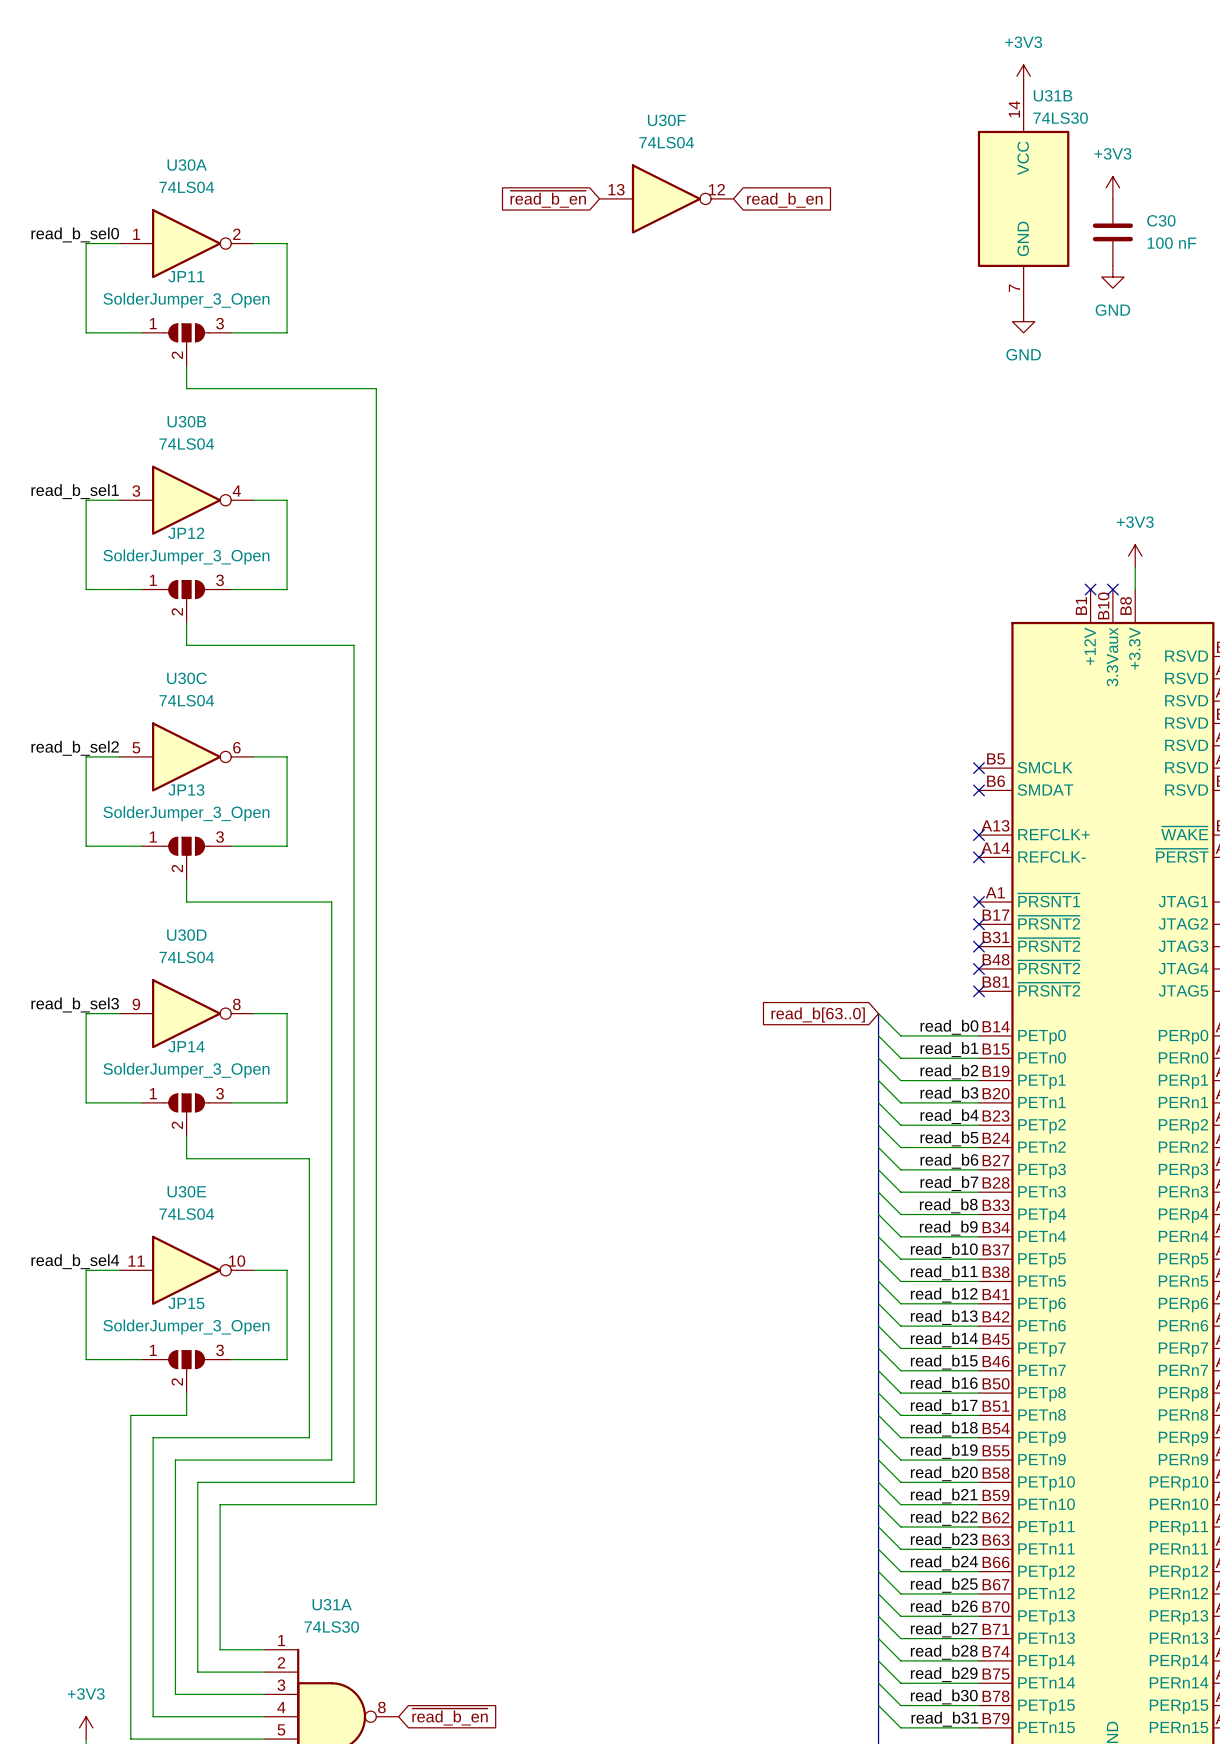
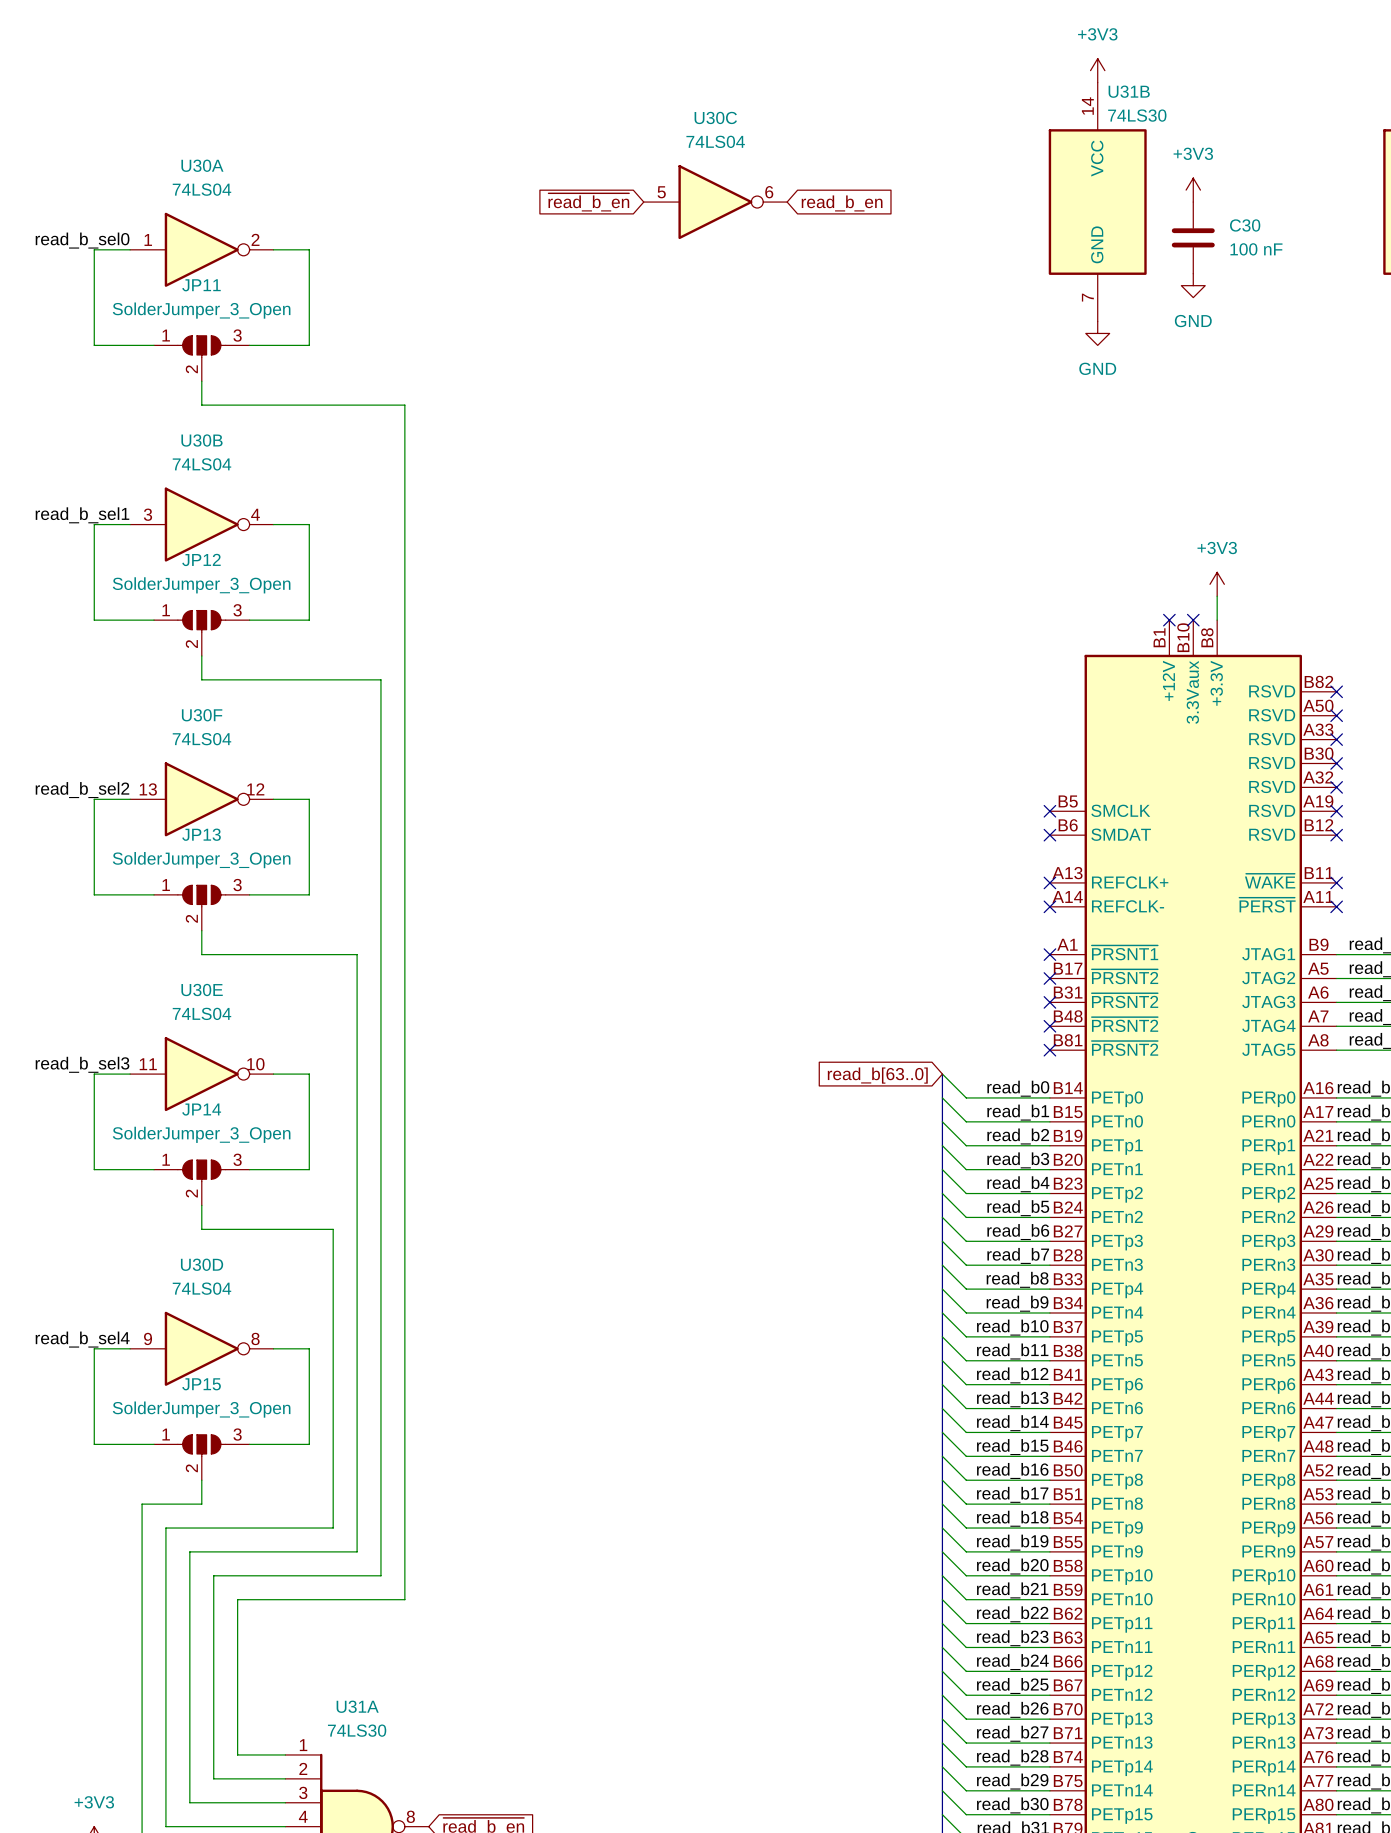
U30F position: (666, 198) -> (201, 799)
U30C position: (186, 756) -> (715, 202)
U30D position: (186, 1013) -> (201, 1348)
U30E position: (186, 1270) -> (201, 1074)

